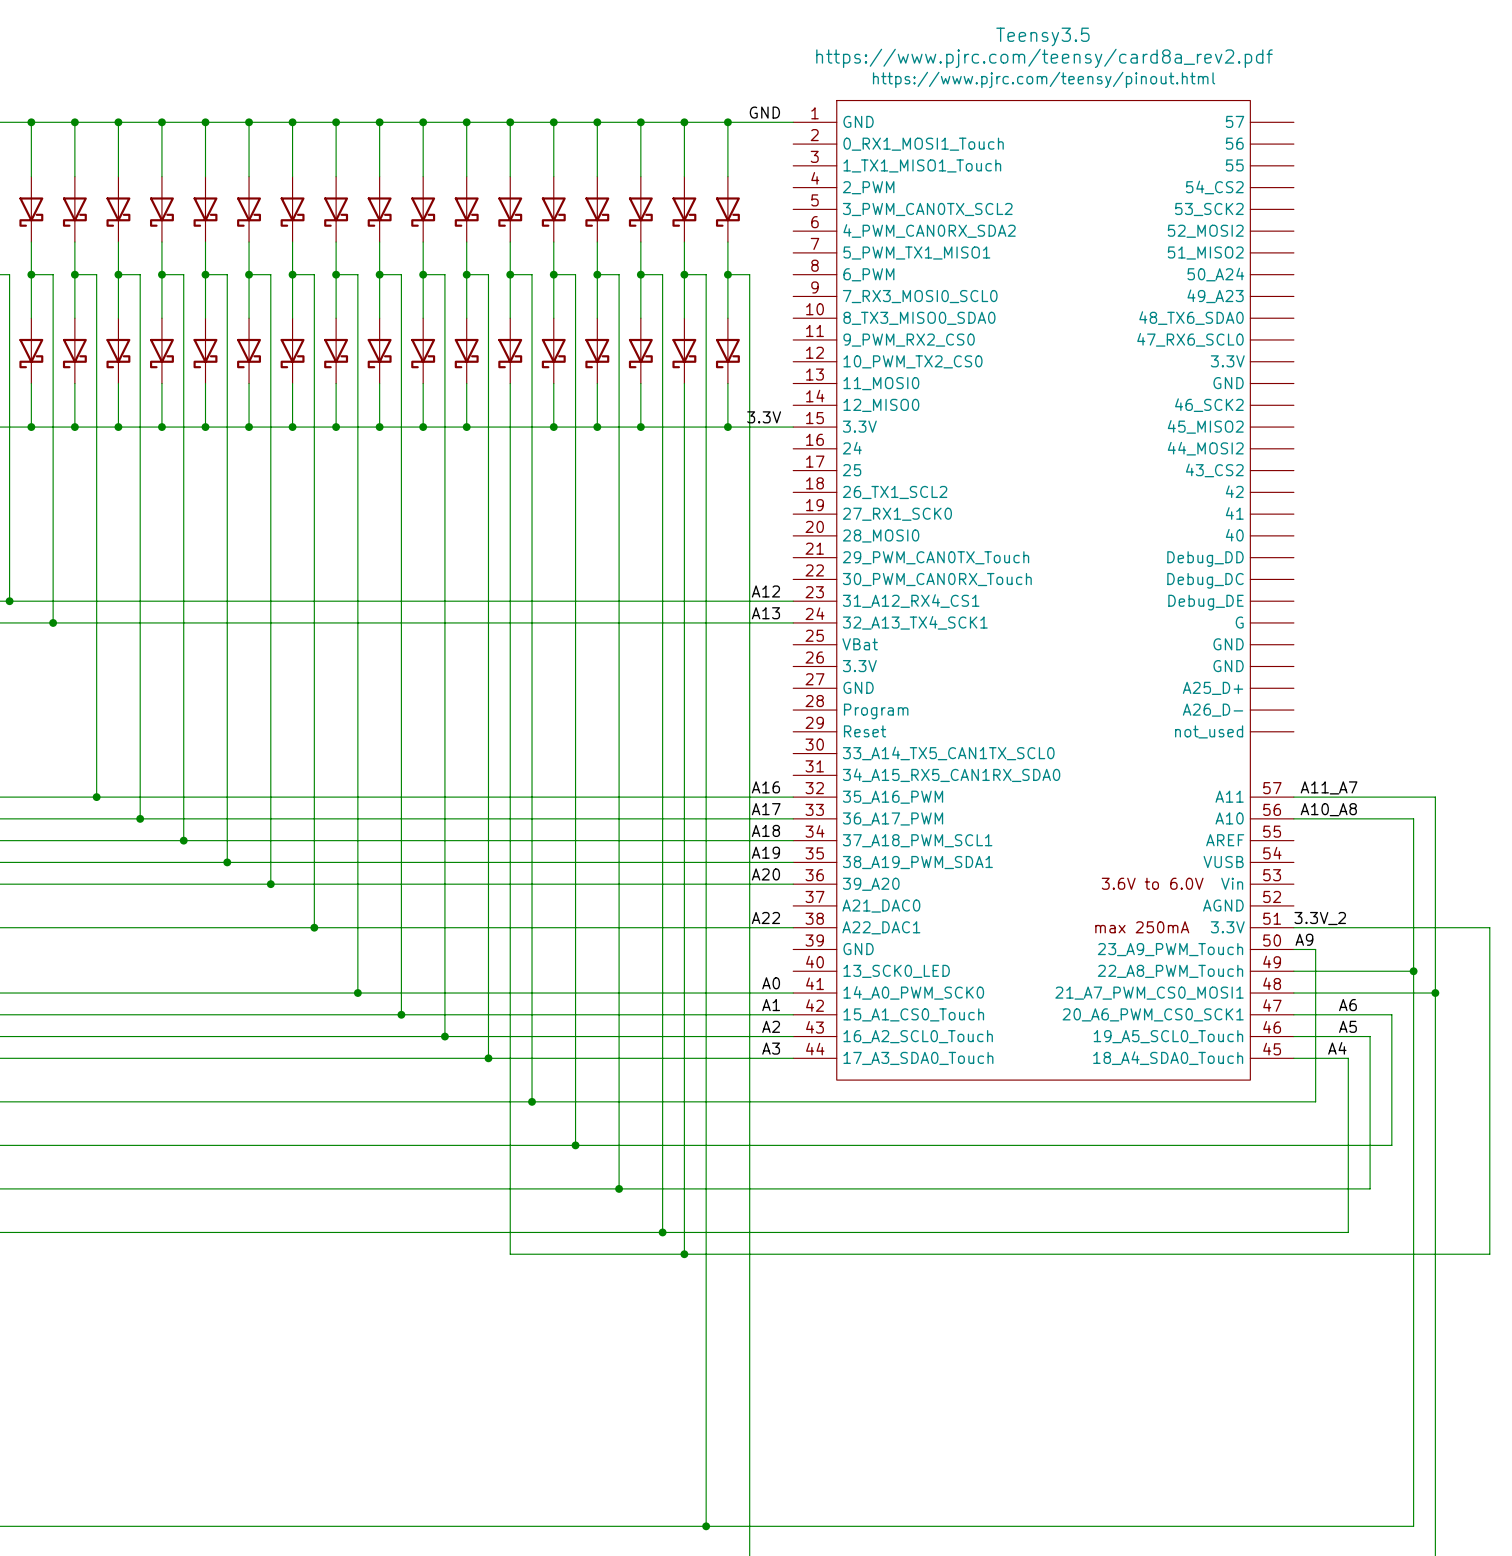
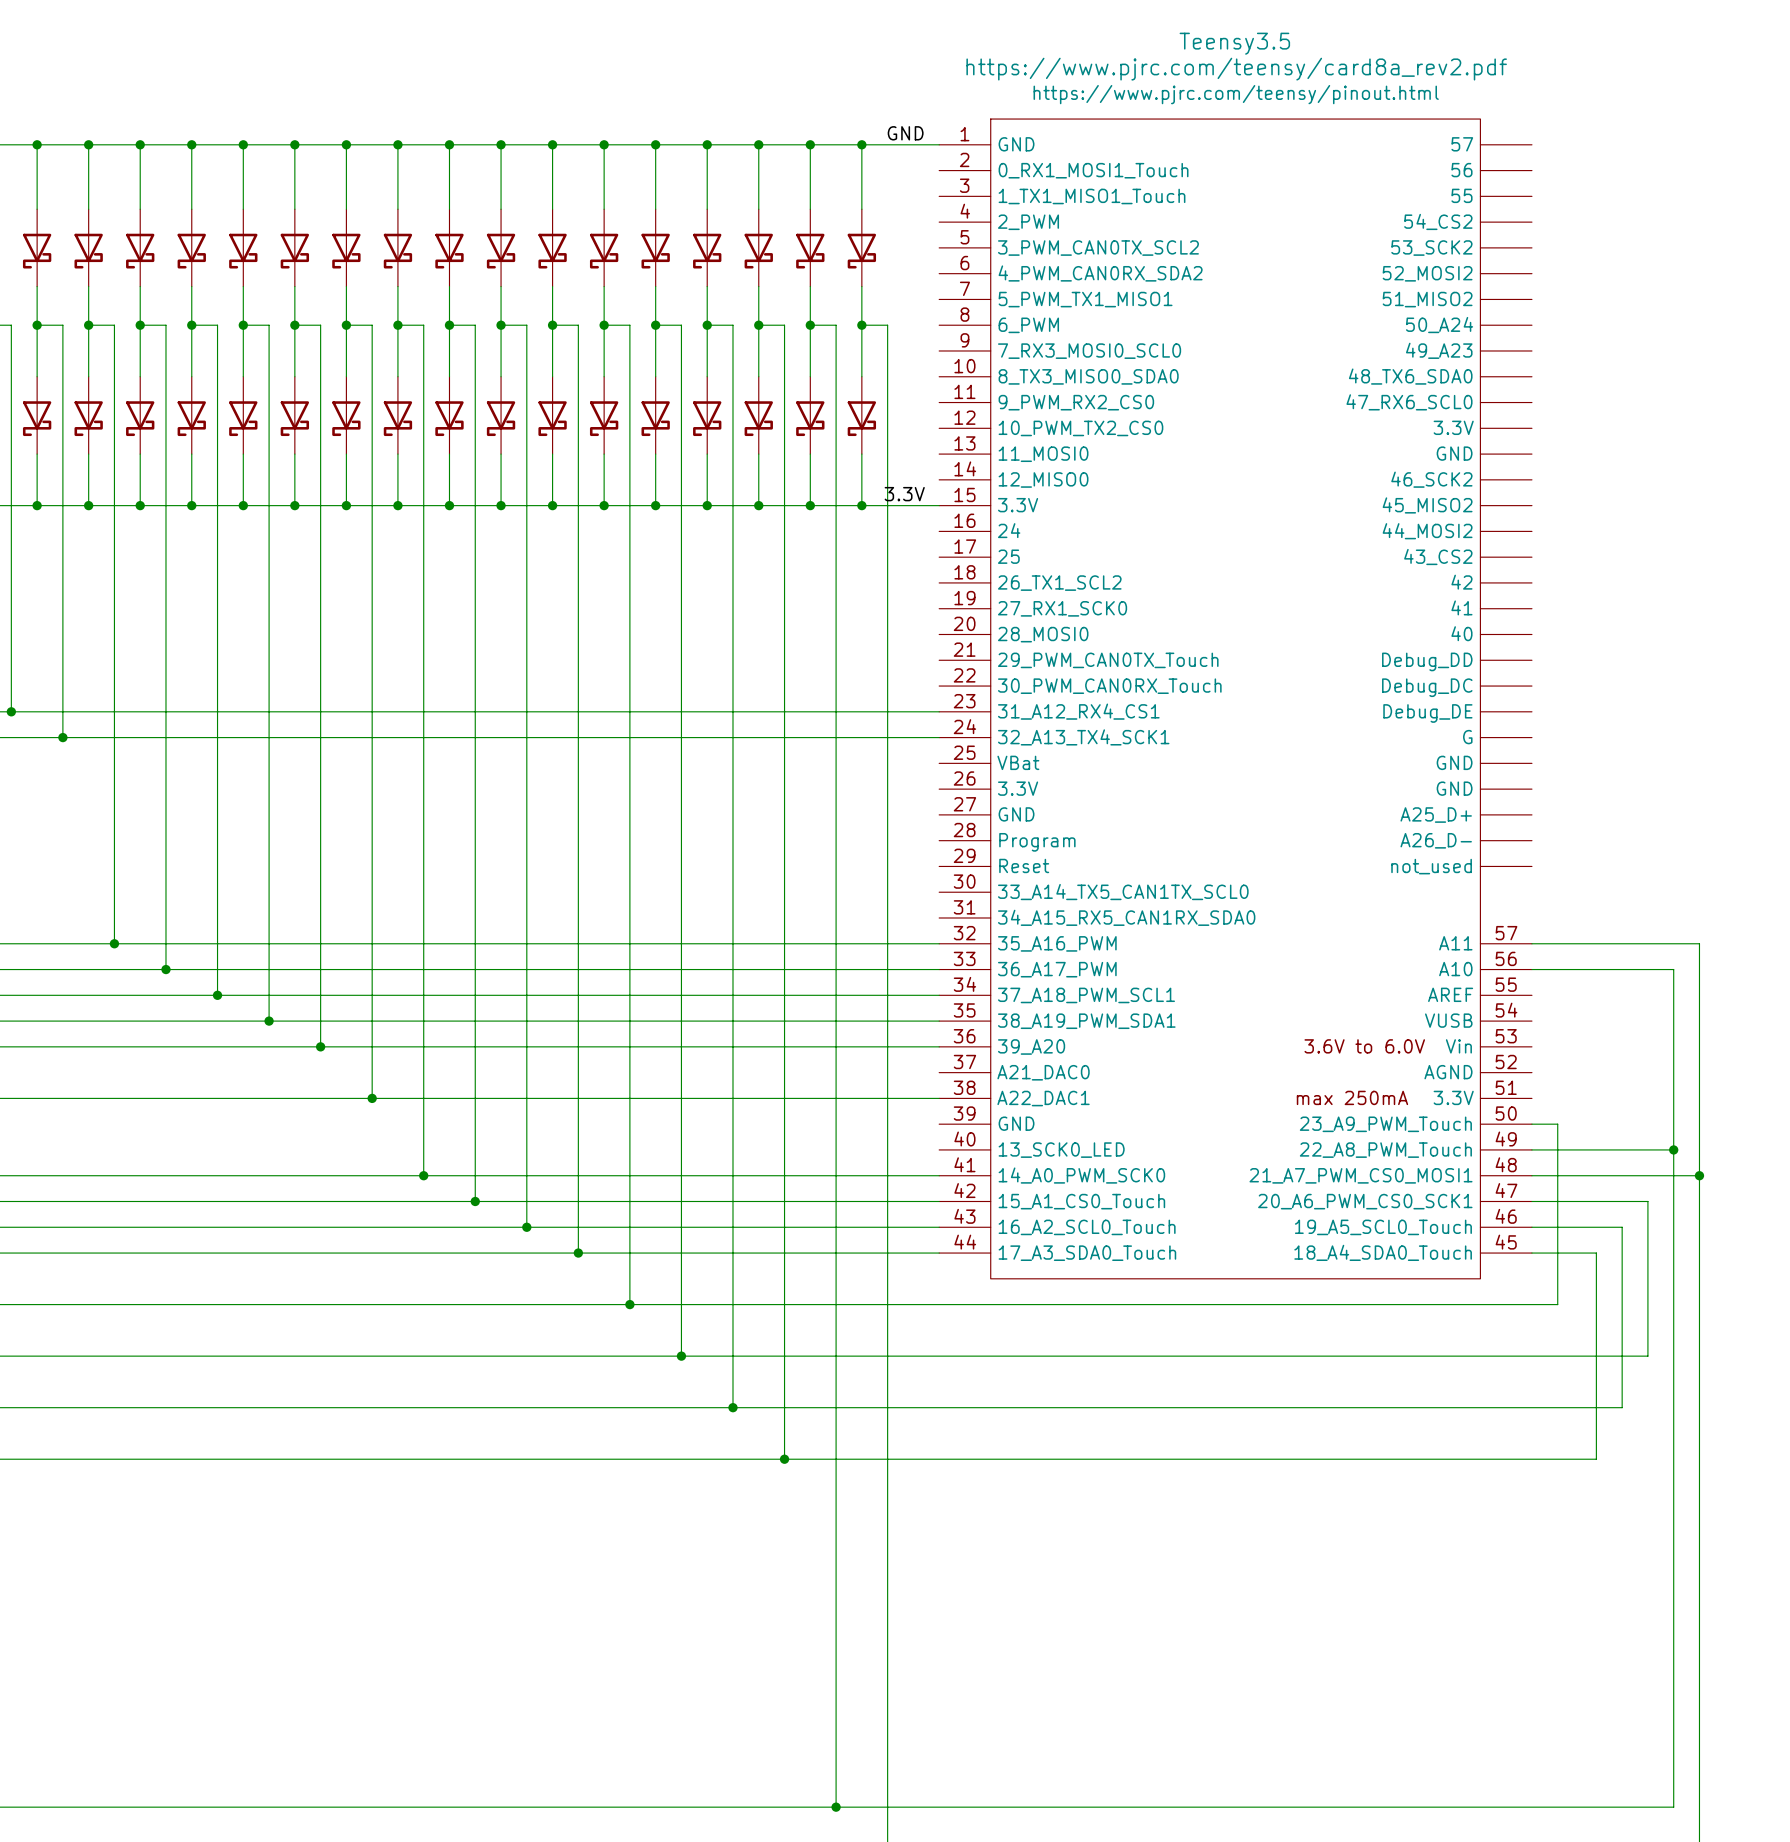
wire: (510, 427) (510, 1254) (1489, 1254) (1489, 927) (1293, 927) -> none
junction: none -> (604, 505)
wire: (684, 427) (684, 1254) -> none
junction: none -> (810, 505)
label: A12 (765, 591) -> none
label: A13 (765, 613) -> none
label: A16 (765, 787) -> none
label: A11_A7 (1329, 787) -> none
label: A17 (766, 809) -> none
label: A10_A8 (1328, 809) -> none
label: A18 (765, 830) -> none
label: A19 (765, 852) -> none
label: A20 (765, 874) -> none
label: A22 (765, 917) -> none
label: 3.3V_2 (1320, 918) -> none
label: A9 (1304, 939) -> none
label: A0 (771, 983) -> none
label: A1 (771, 1005) -> none
label: A6 (1347, 1005) -> none
label: A2 (771, 1026) -> none
label: A5 (1347, 1026) -> none
label: A3 (771, 1048) -> none
label: A4 (1337, 1048) -> none
junction: (684, 1254) -> none

